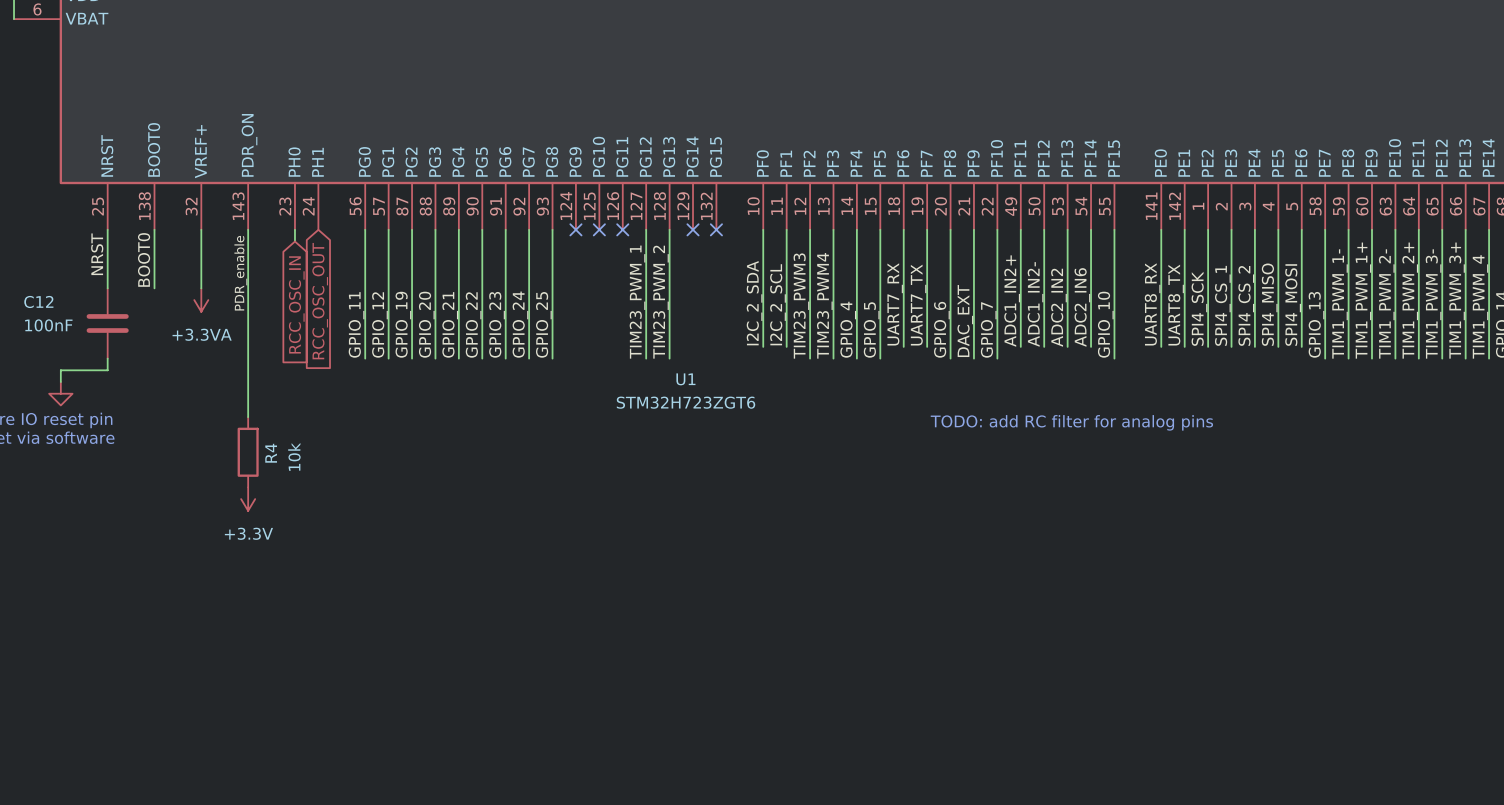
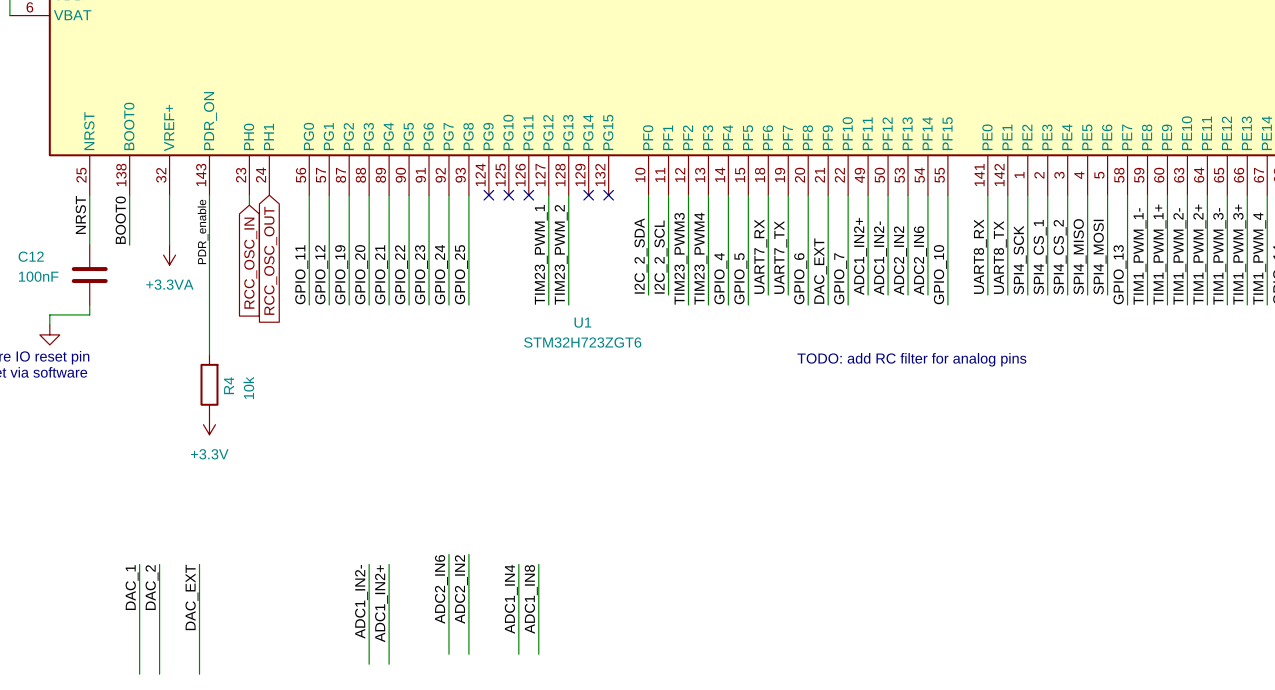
wire: none -> (448, 554) (448, 654)
wire: none -> (468, 554) (468, 654)
wire: none -> (139, 564) (139, 674)
wire: none -> (159, 564) (159, 674)
wire: none -> (199, 564) (199, 674)
wire: none -> (369, 564) (369, 664)
wire: none -> (389, 564) (389, 664)
wire: none -> (518, 564) (518, 654)
wire: none -> (538, 564) (538, 654)
label: none -> DAC_1 (132, 587)
label: none -> DAC_2 (152, 587)
label: none -> ADC2_IN6 (441, 589)
label: none -> ADC2_IN2 (461, 589)
label: none -> DAC_EXT (191, 597)
label: none -> ADC1_IN4 (511, 599)
label: none -> ADC1_IN8 (531, 599)
label: none -> ADC1_IN2- (361, 601)
label: none -> ADC1_IN2+ (381, 603)

